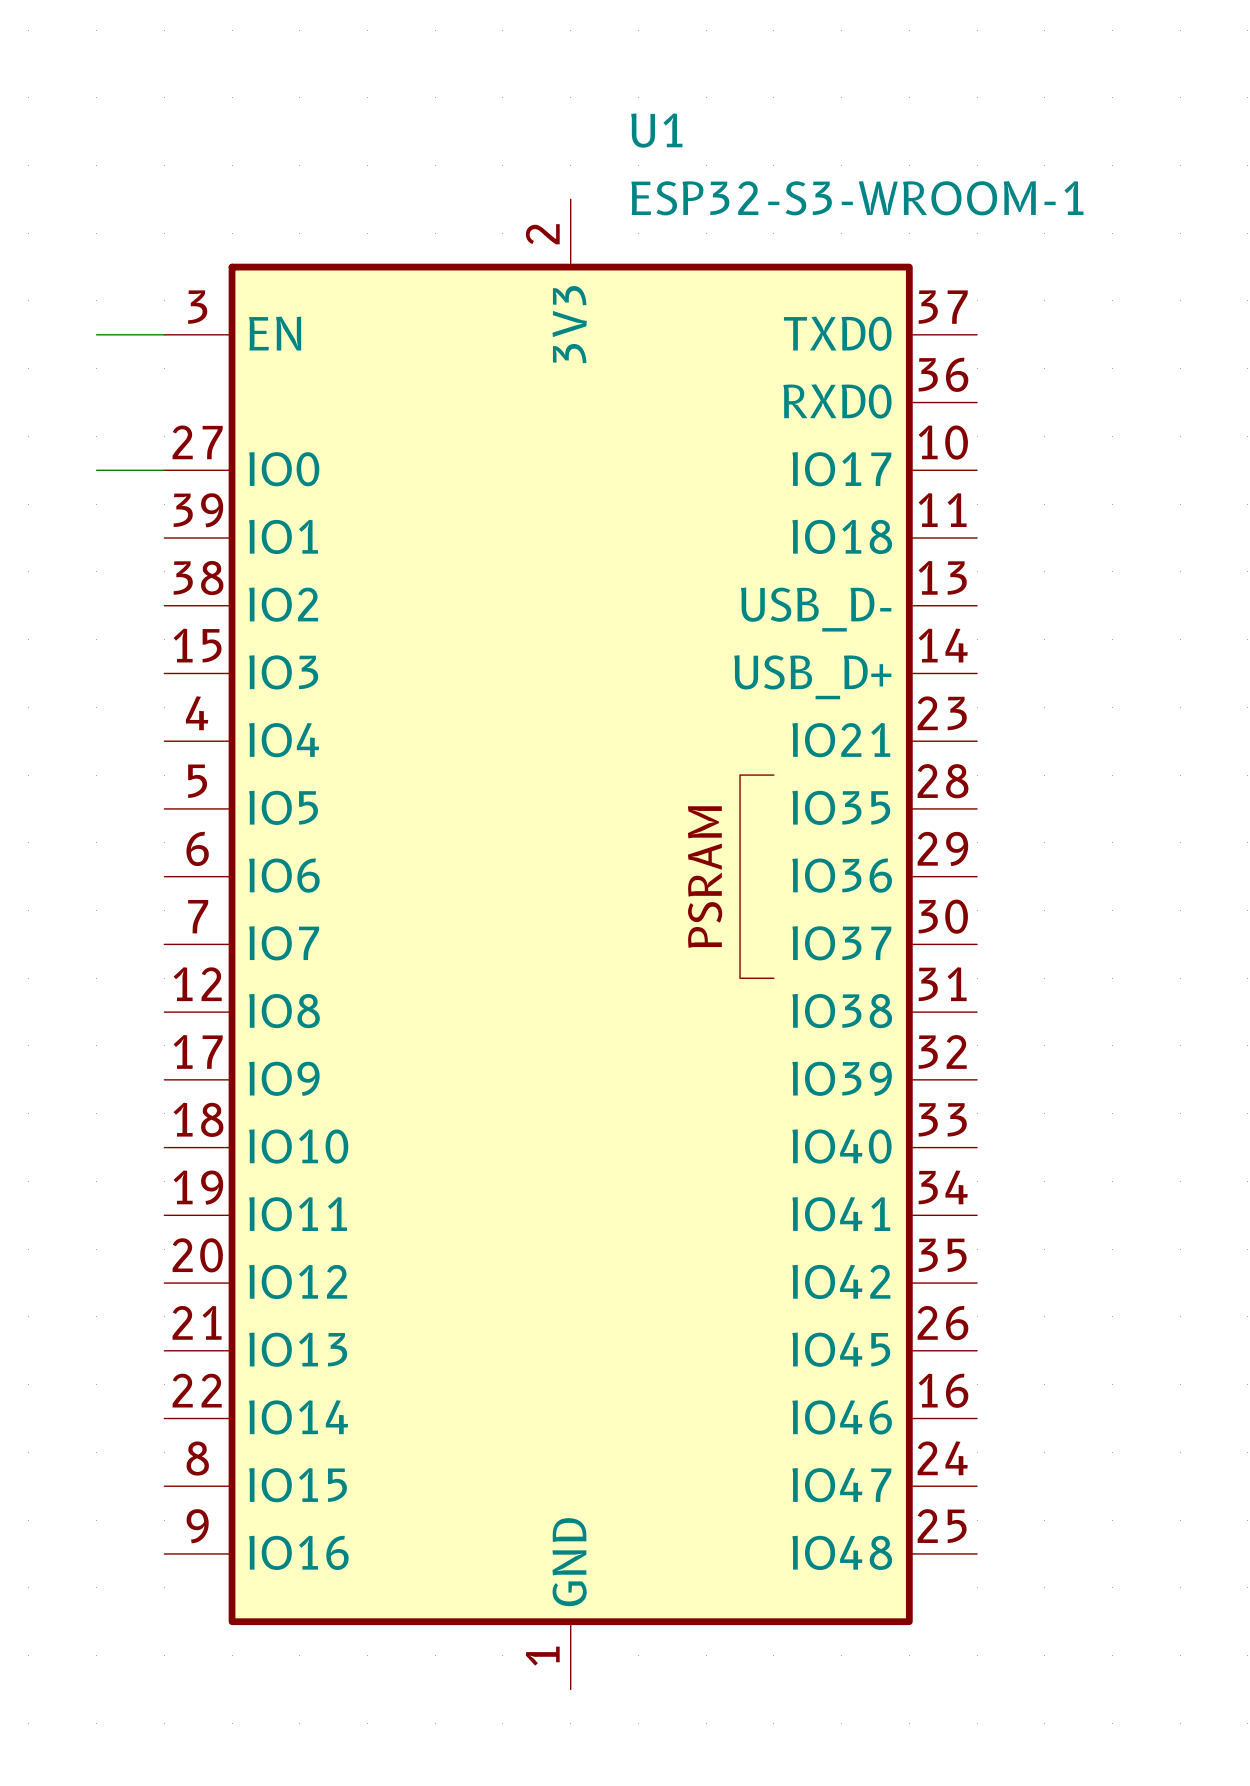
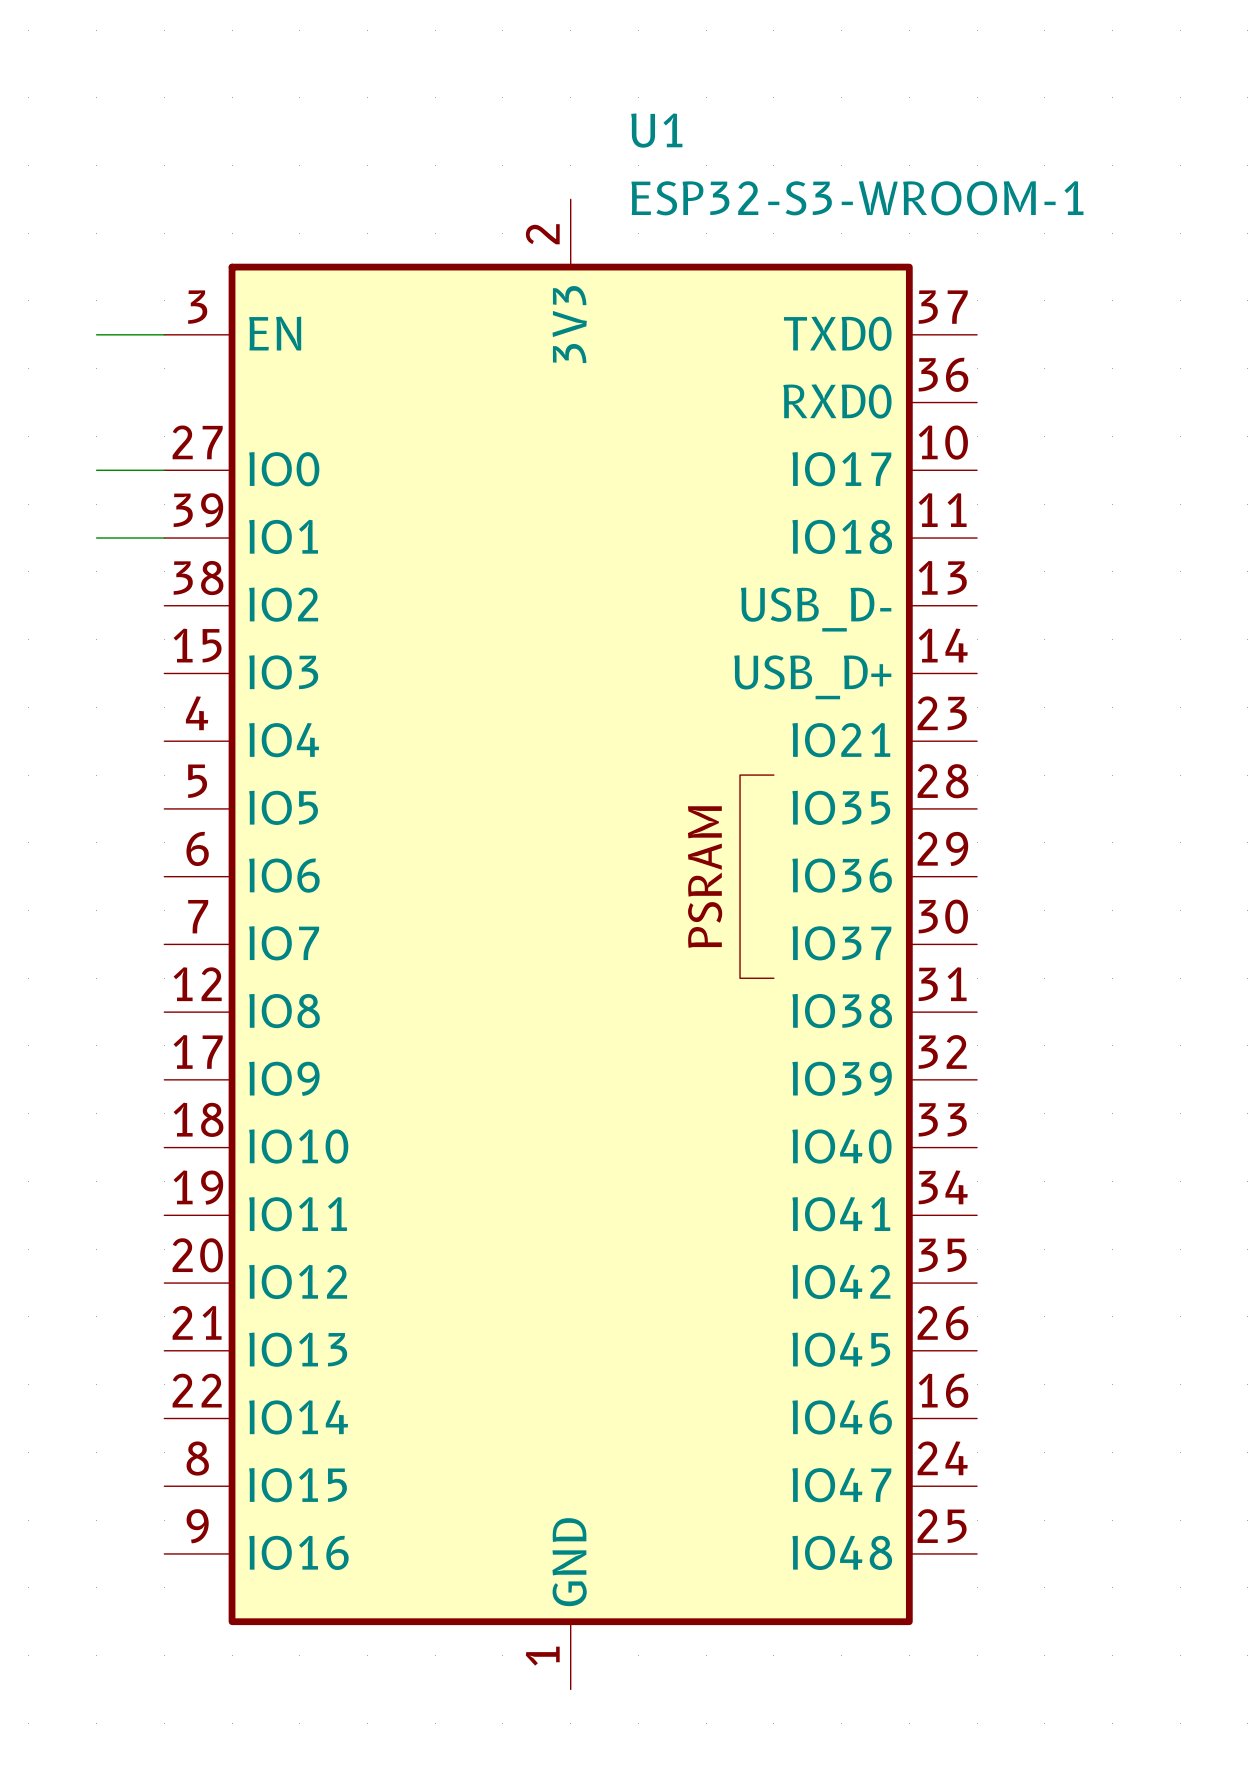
wire: none -> (96, 538) (164, 538)

